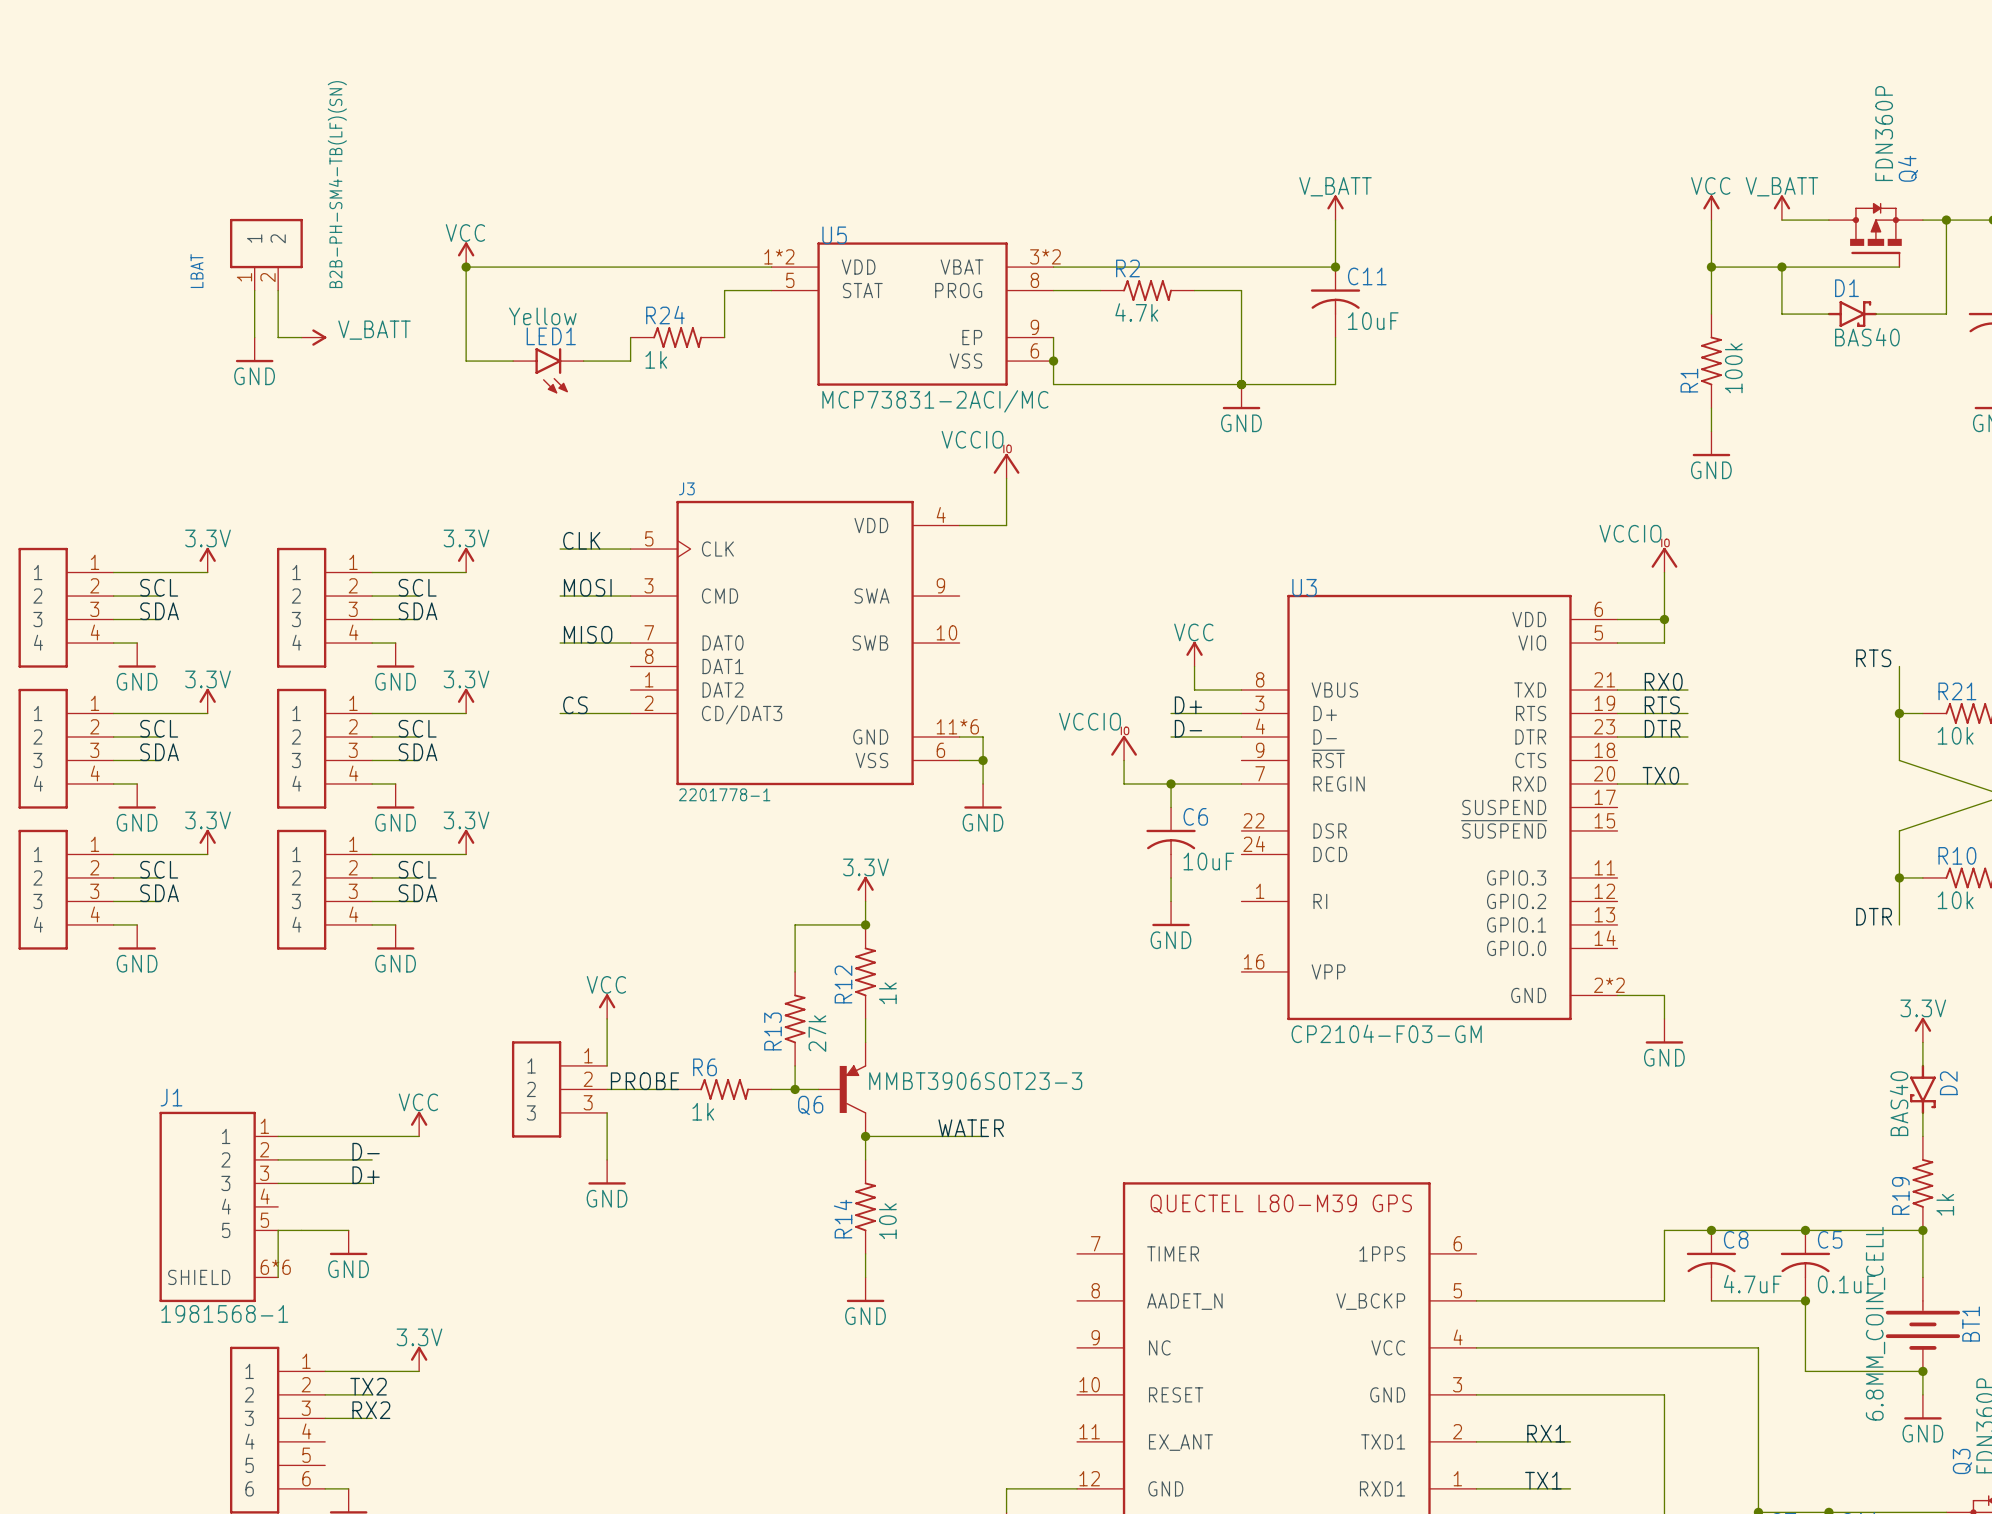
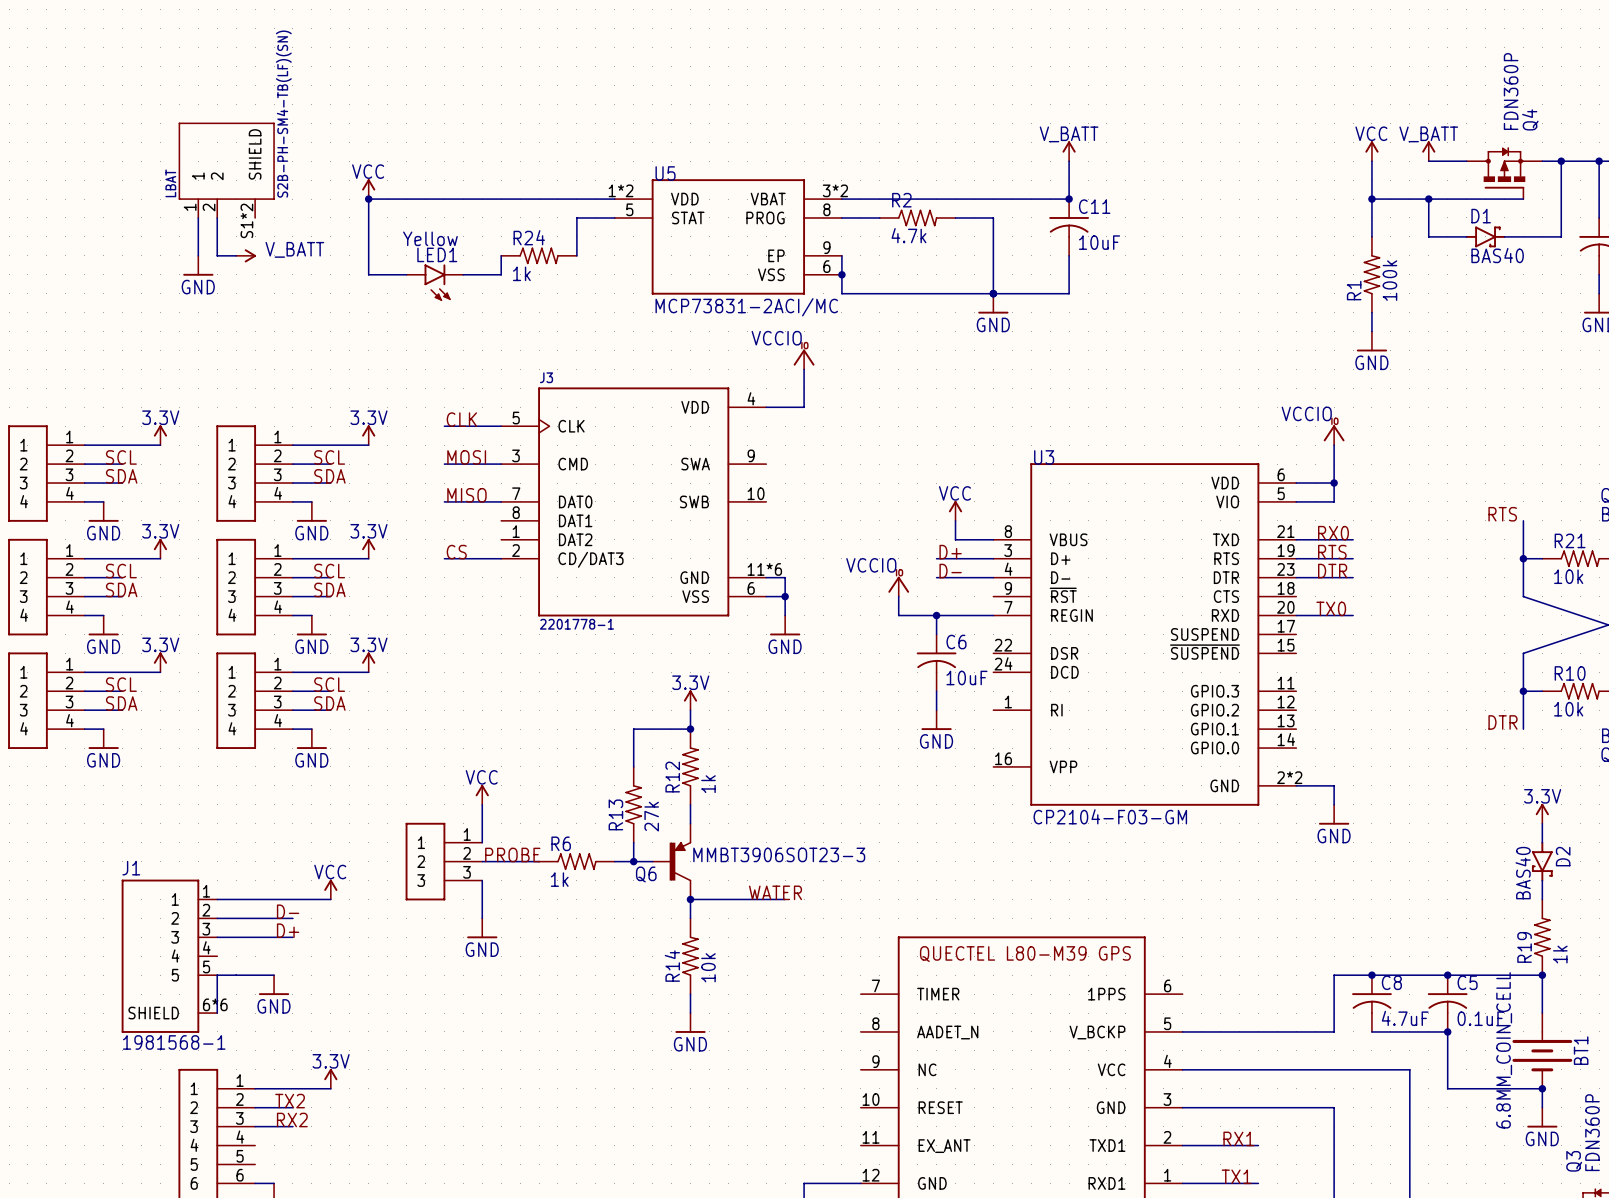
LBAT: none -> S2B-PH-SM4-TB(LF)(SN) (226, 170)
LBAT: B2B-PH-SM4-TB(LF)(SN) (266, 254) -> none

